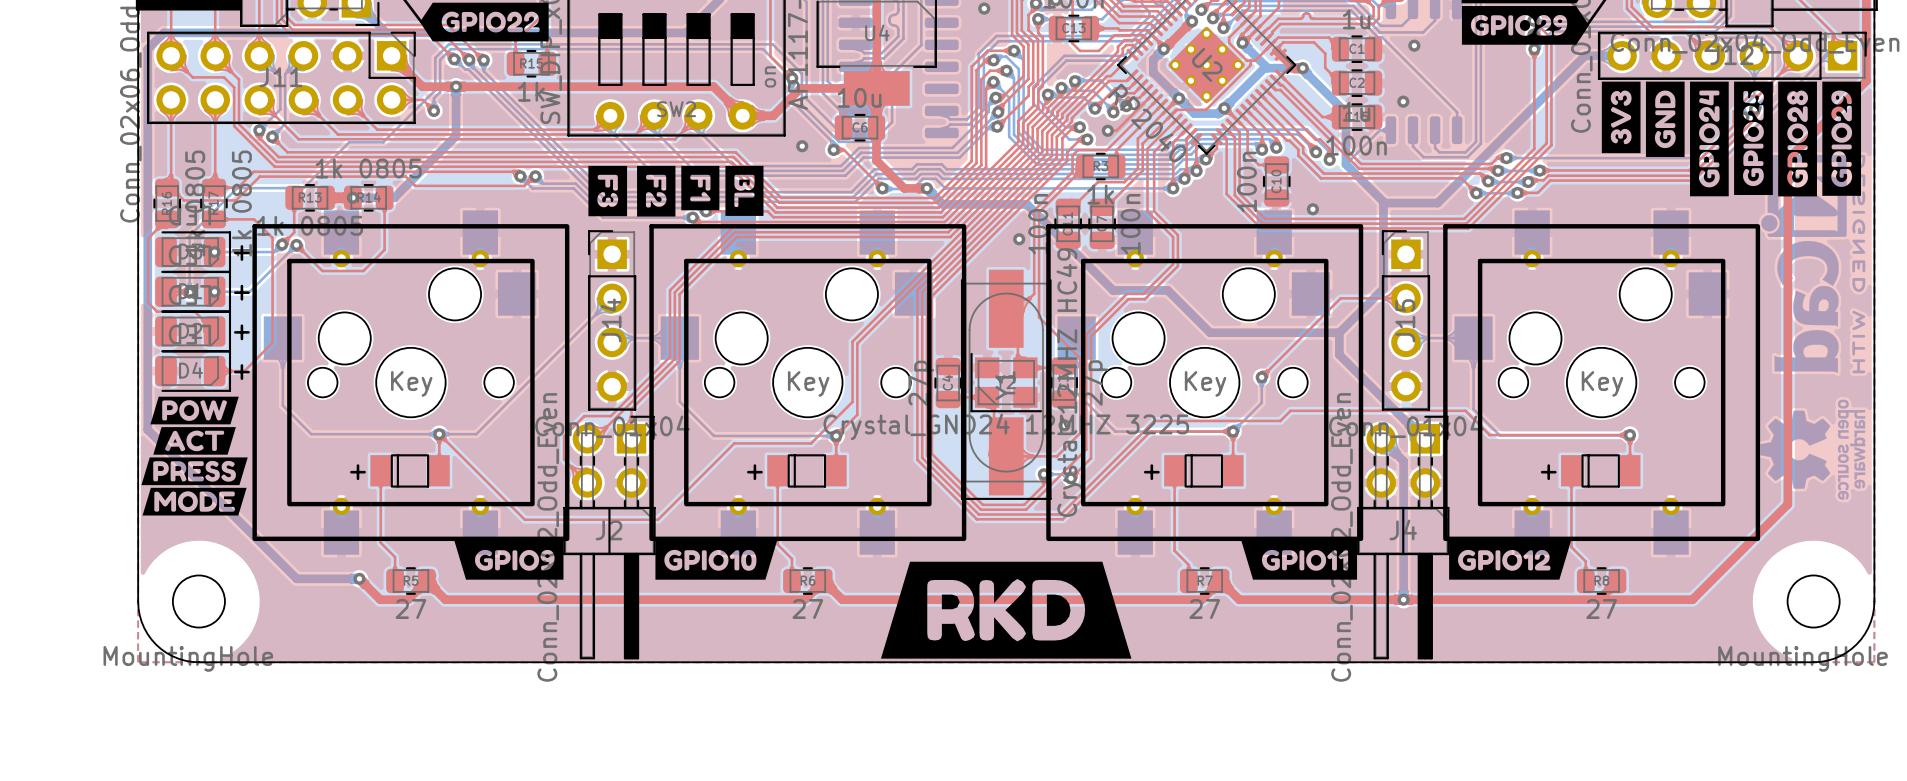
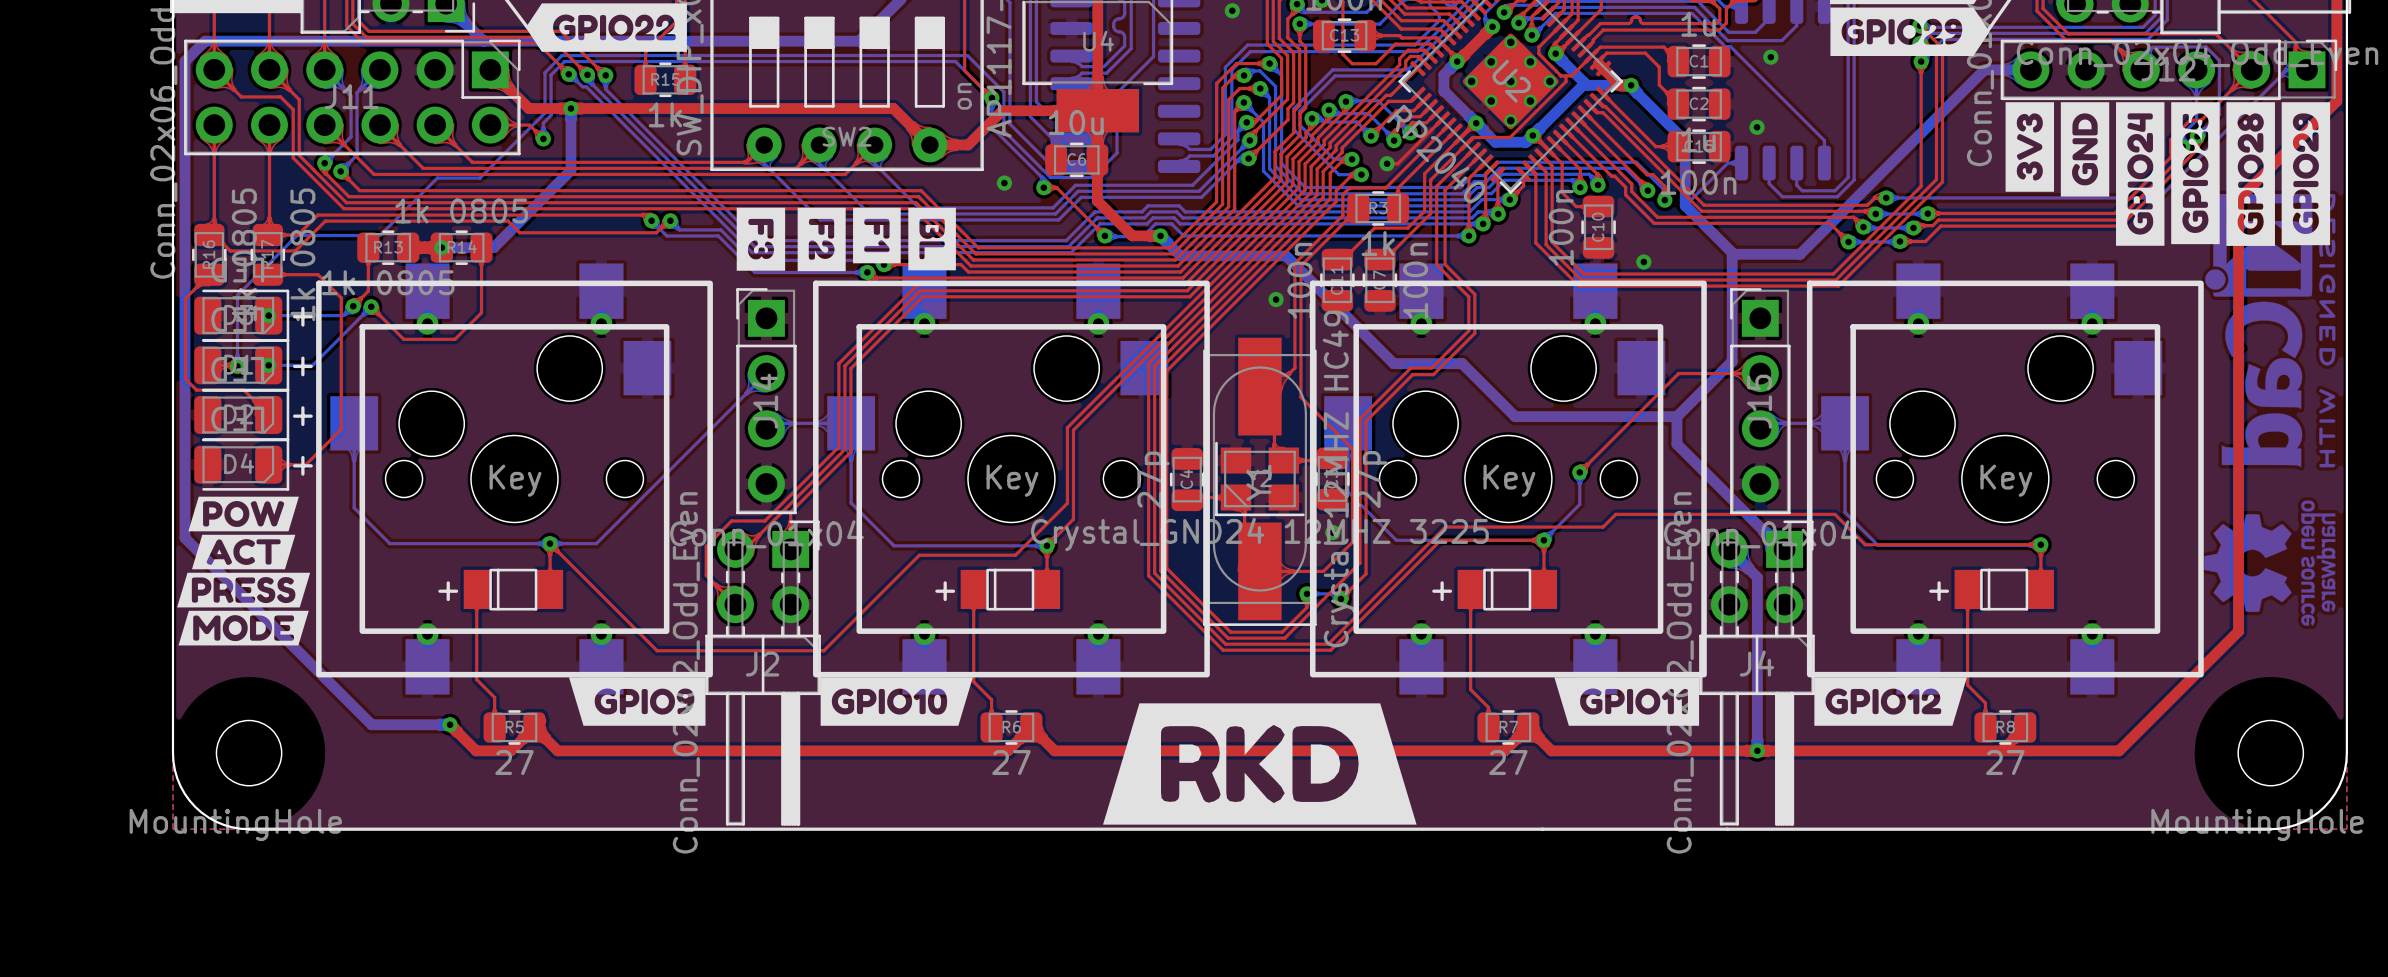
line: none -> (249, 829) (2270, 829)
board edge: (198, 662) (1813, 662) -> none

